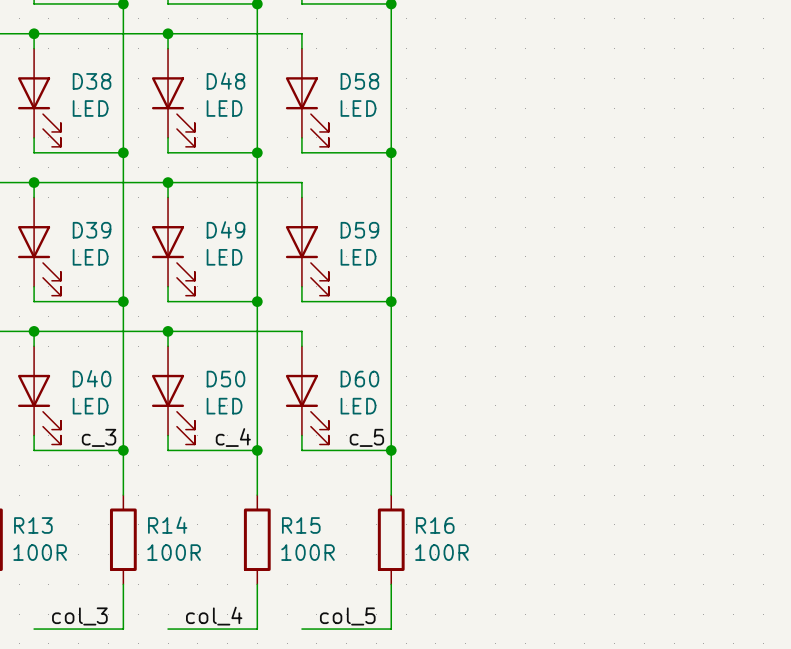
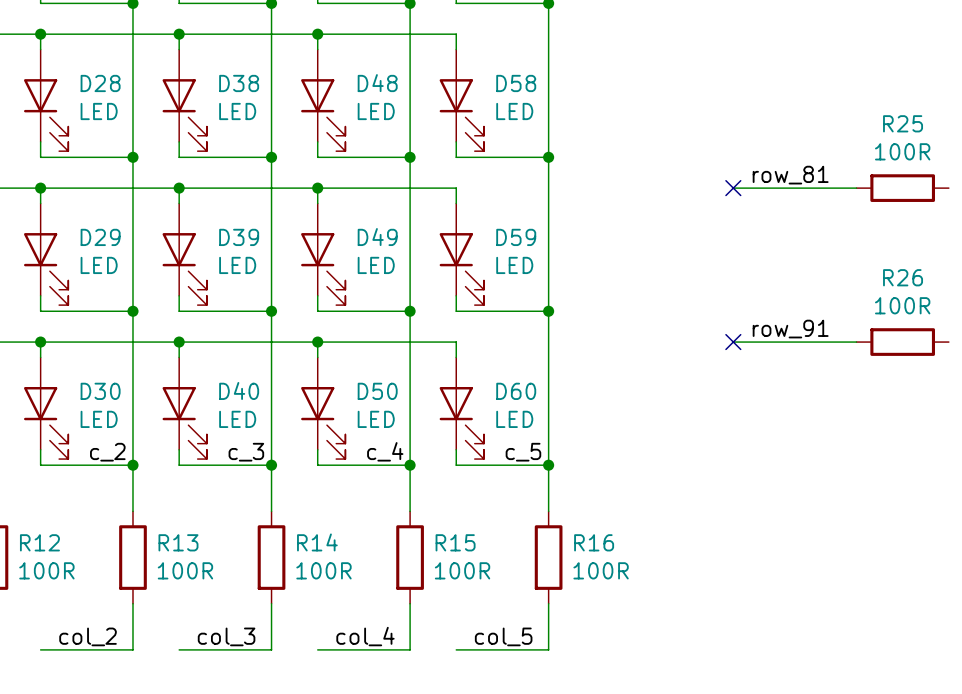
label: none -> row_81 (790, 175)
wire: none -> (733, 188) (856, 188)
no-connect mark: none -> (733, 188)
R25: none -> 100R (902, 188)
label: none -> row_91 (790, 329)
wire: none -> (733, 342) (856, 342)
no-connect mark: none -> (733, 342)
R26: none -> 100R (902, 342)

